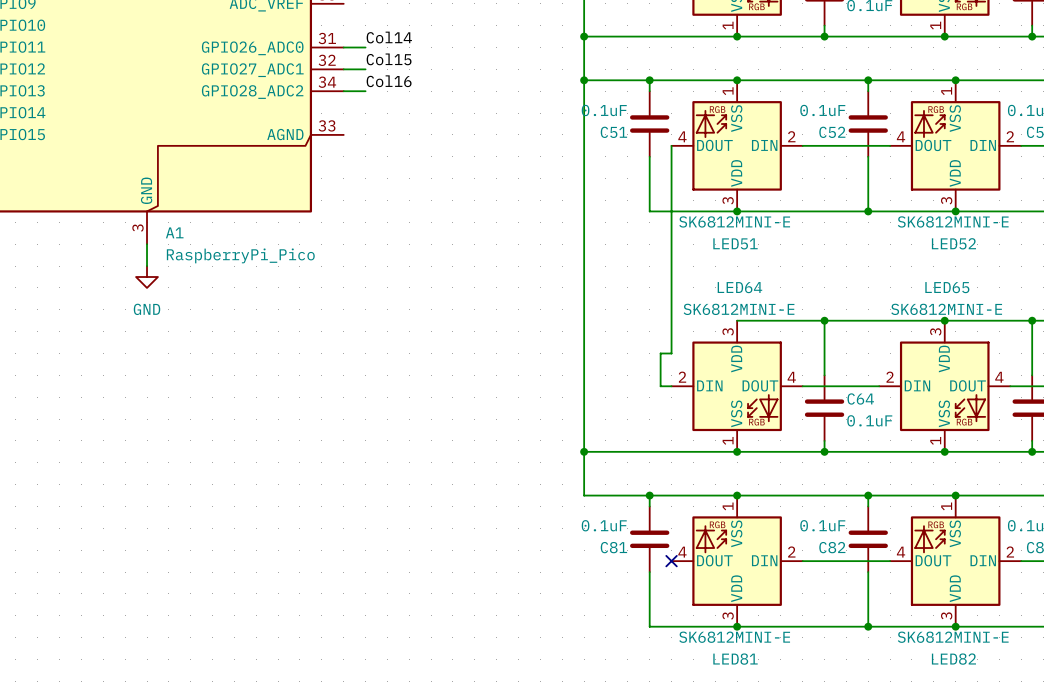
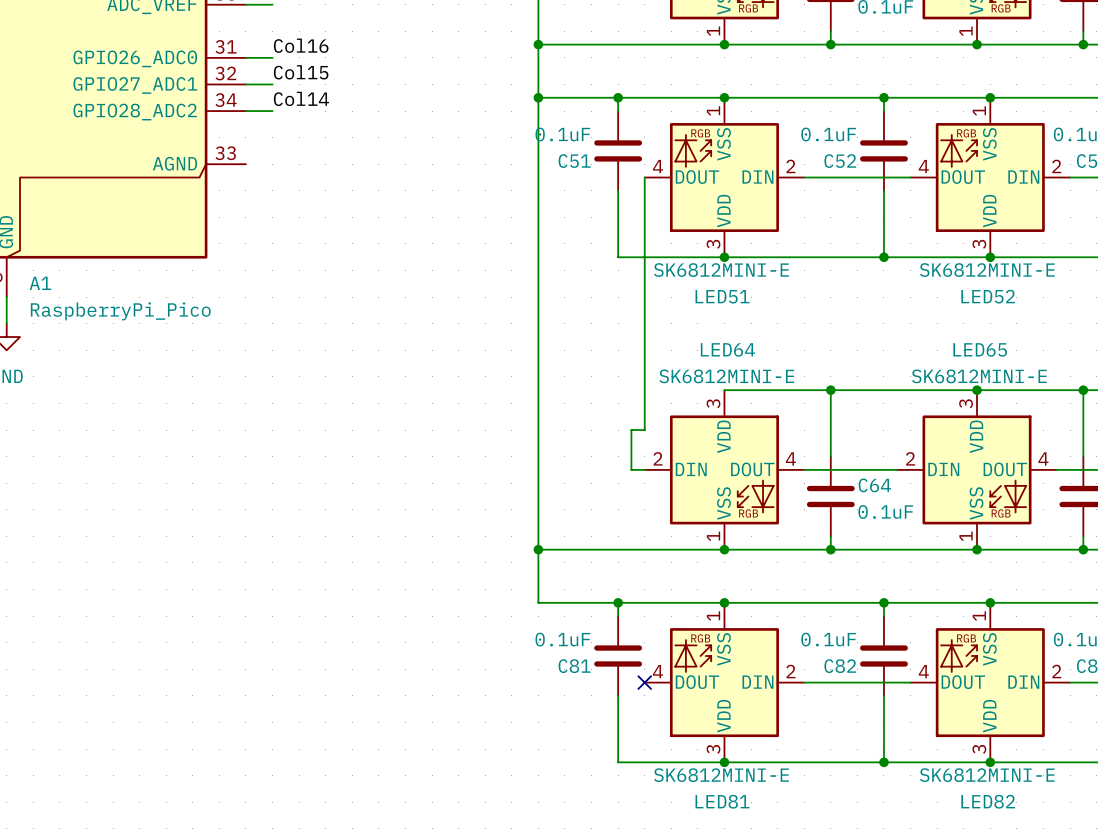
wire: none -> (245, 4) (272, 4)
label: Col14 (389, 37) -> Col16 (301, 45)
label: Col16 (389, 81) -> Col14 (301, 98)

